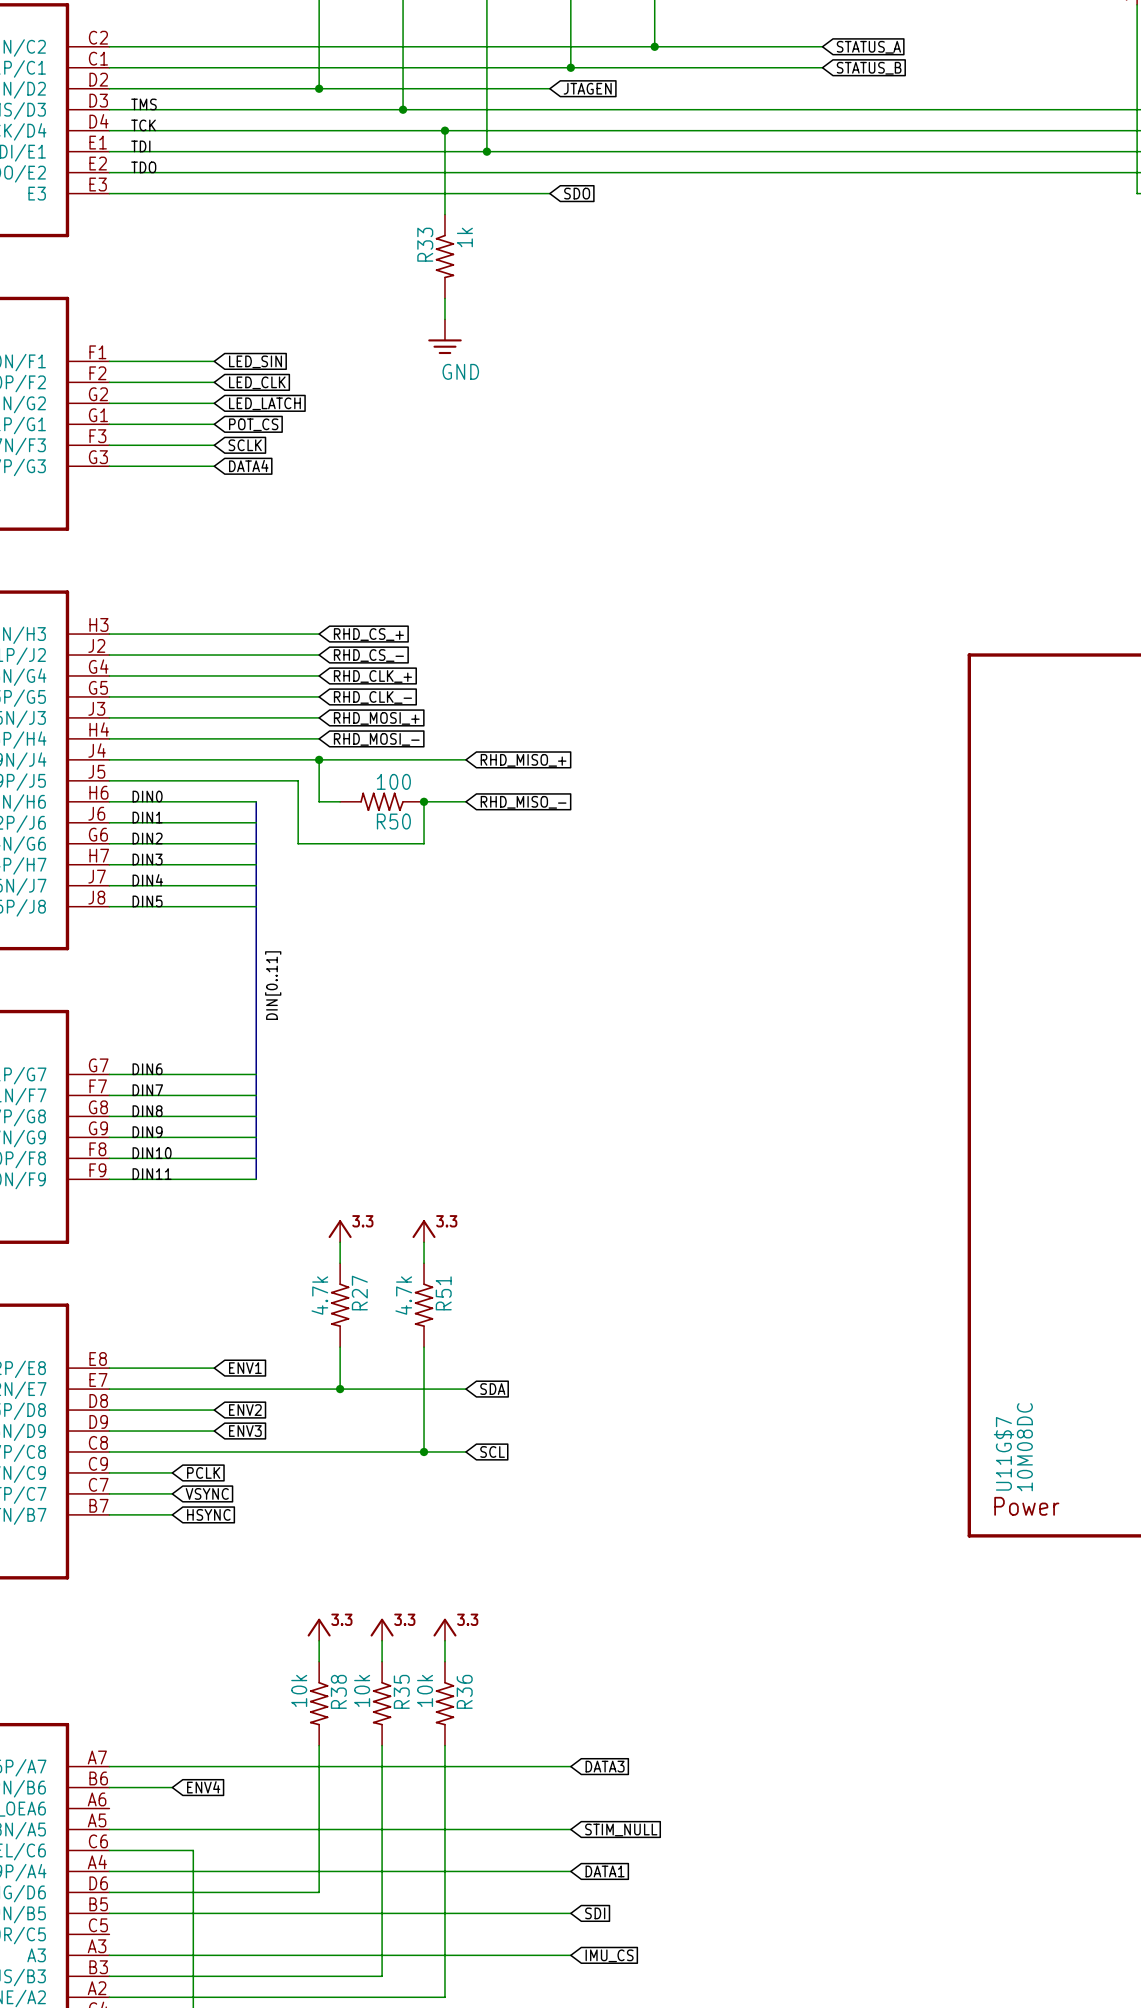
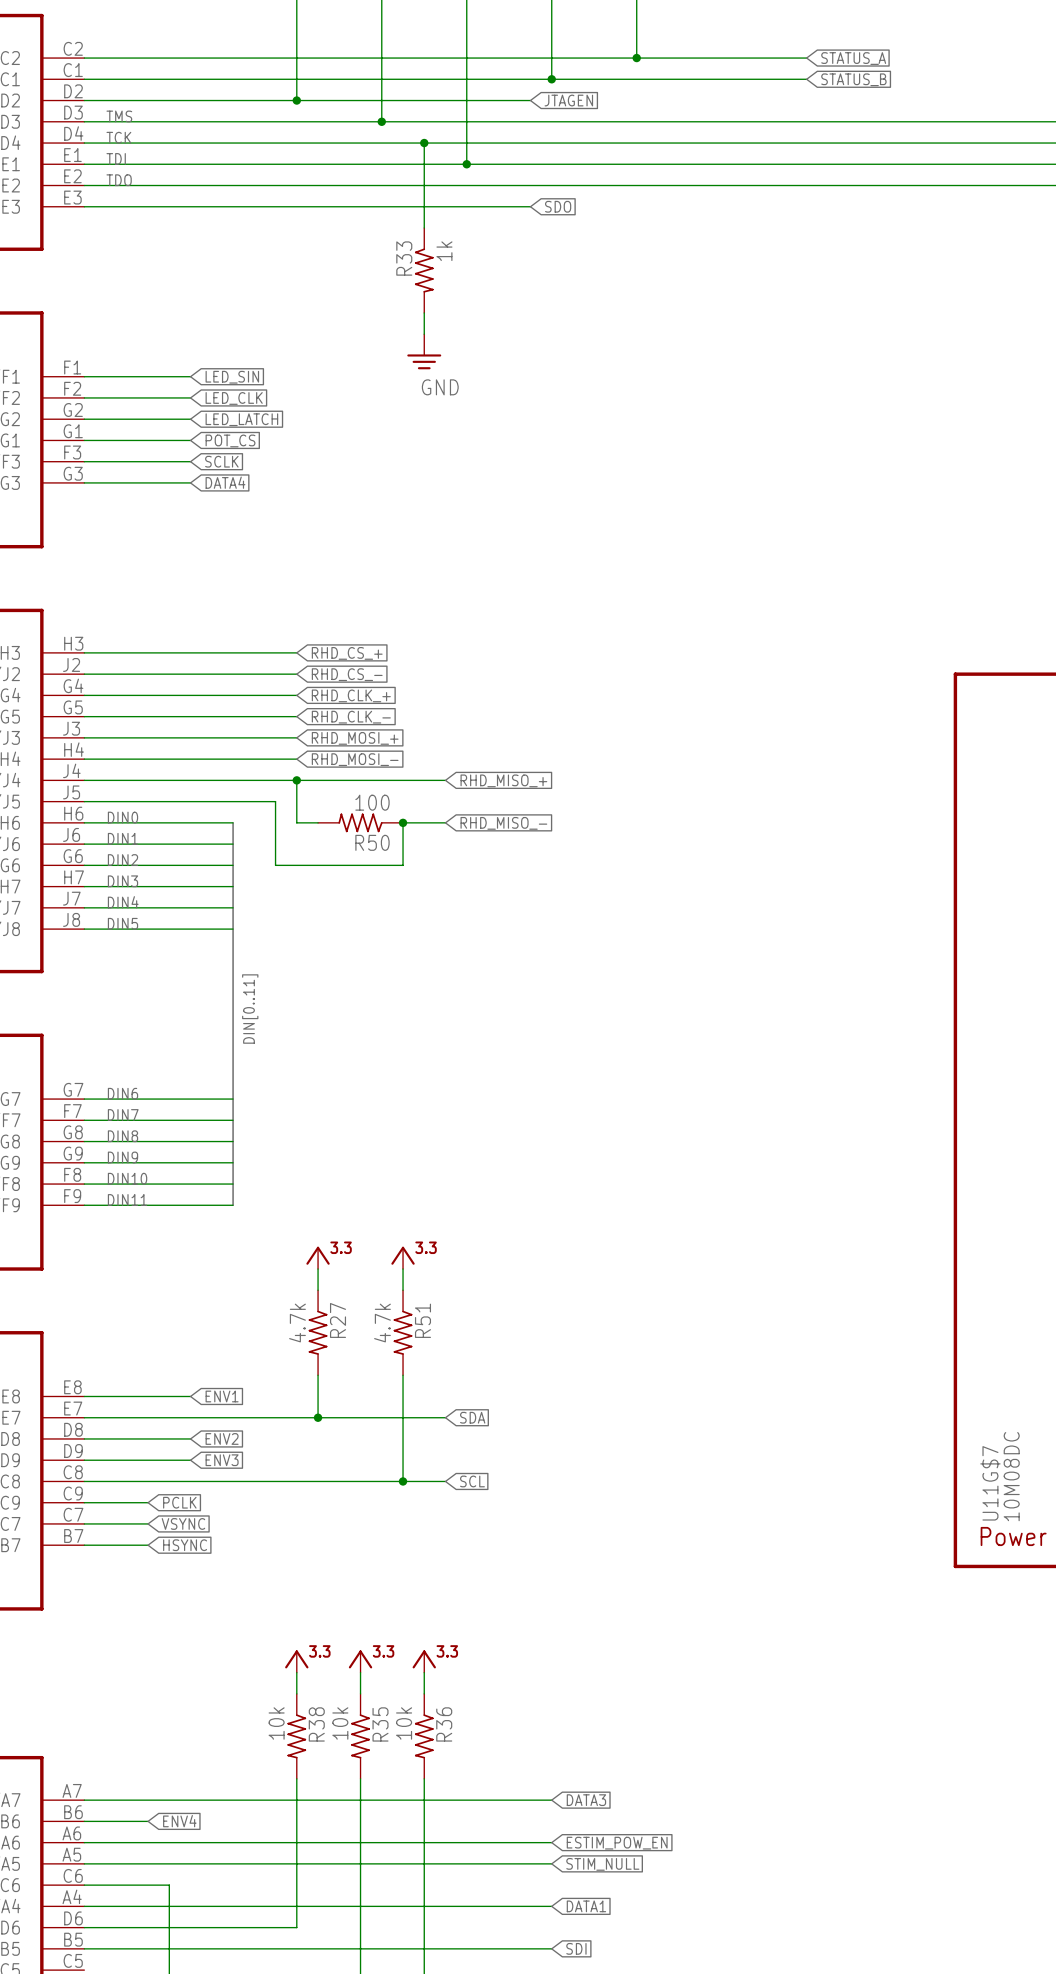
wire: none -> (84, 1842) (551, 1842)
global label: none -> ESTIM_POW_EN (617, 1843)

